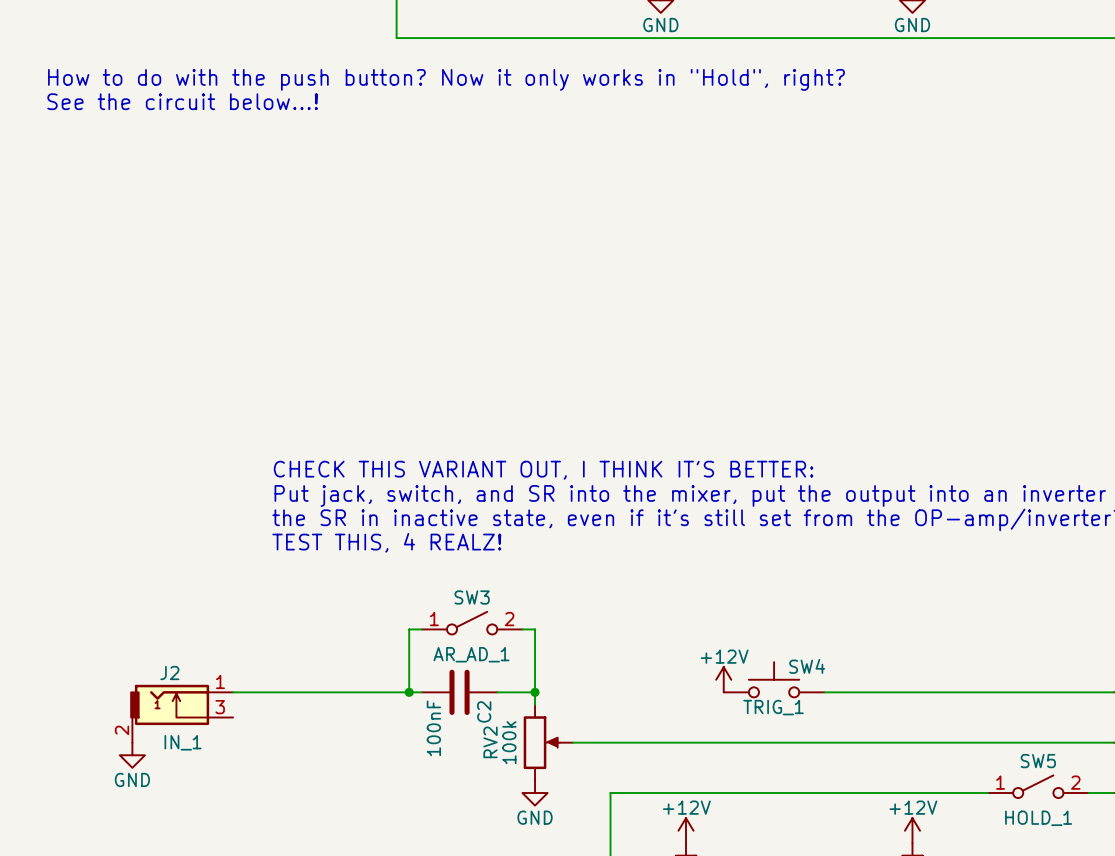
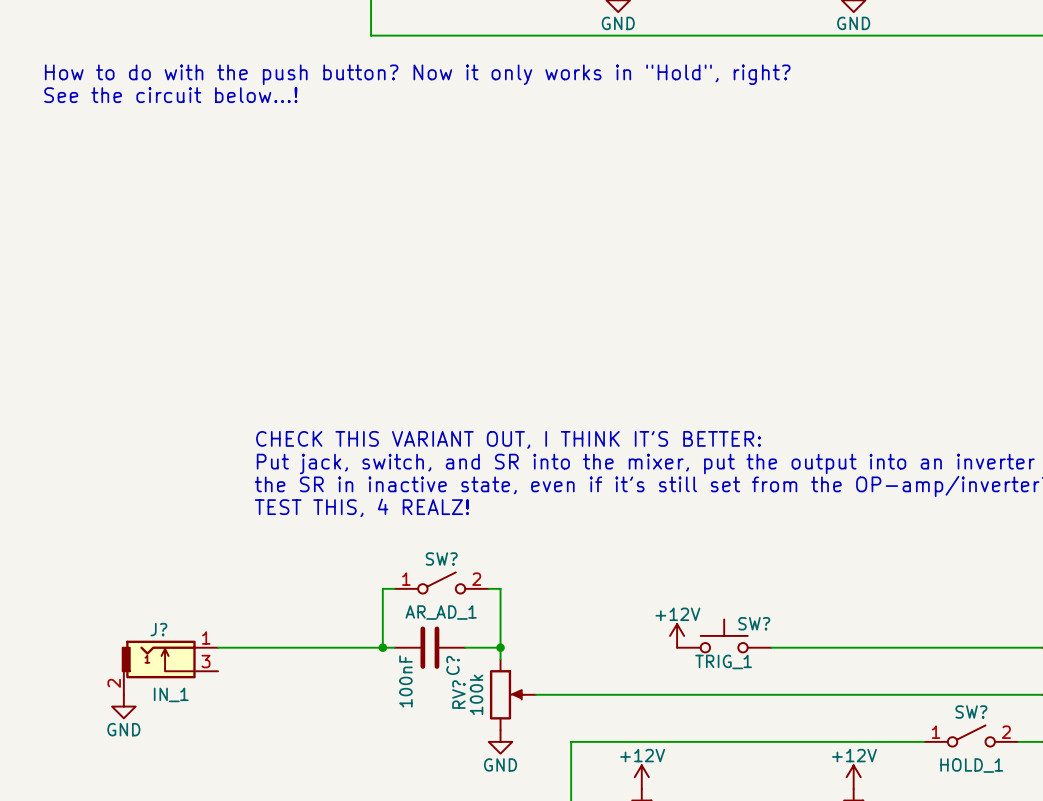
SW3 name: SW3 (472, 597) -> SW? (441, 558)
SW4 name: SW4 (807, 666) -> SW? (754, 623)
J2 name: J2 (169, 673) -> J? (158, 629)
C2 name: C2 (484, 711) -> C? (453, 665)
RV2 name: RV2 (490, 742) -> RV? (458, 694)
SW5 name: SW5 (1038, 761) -> SW? (971, 712)

